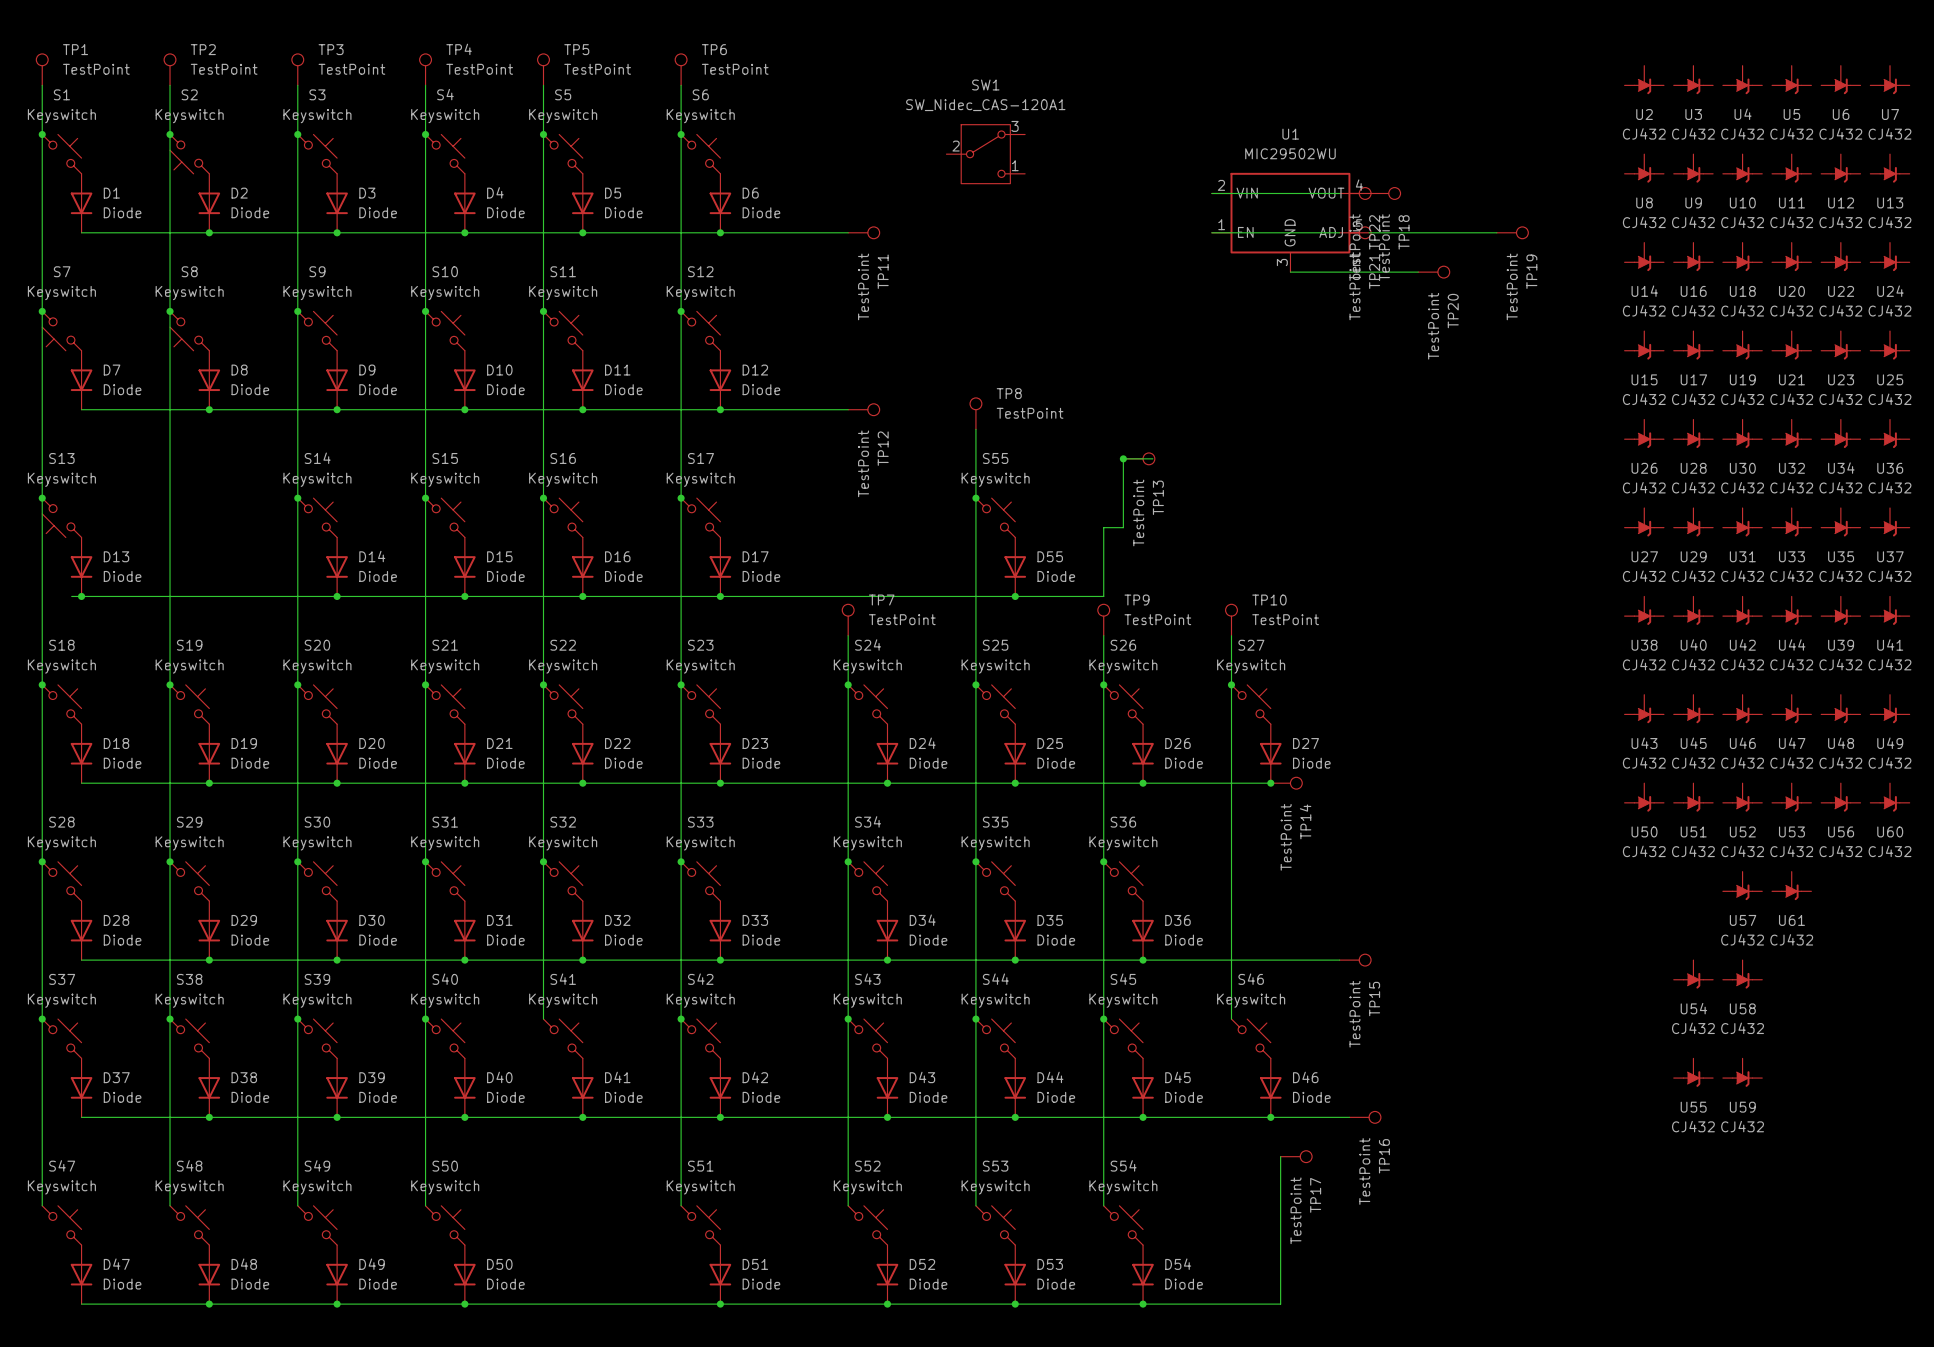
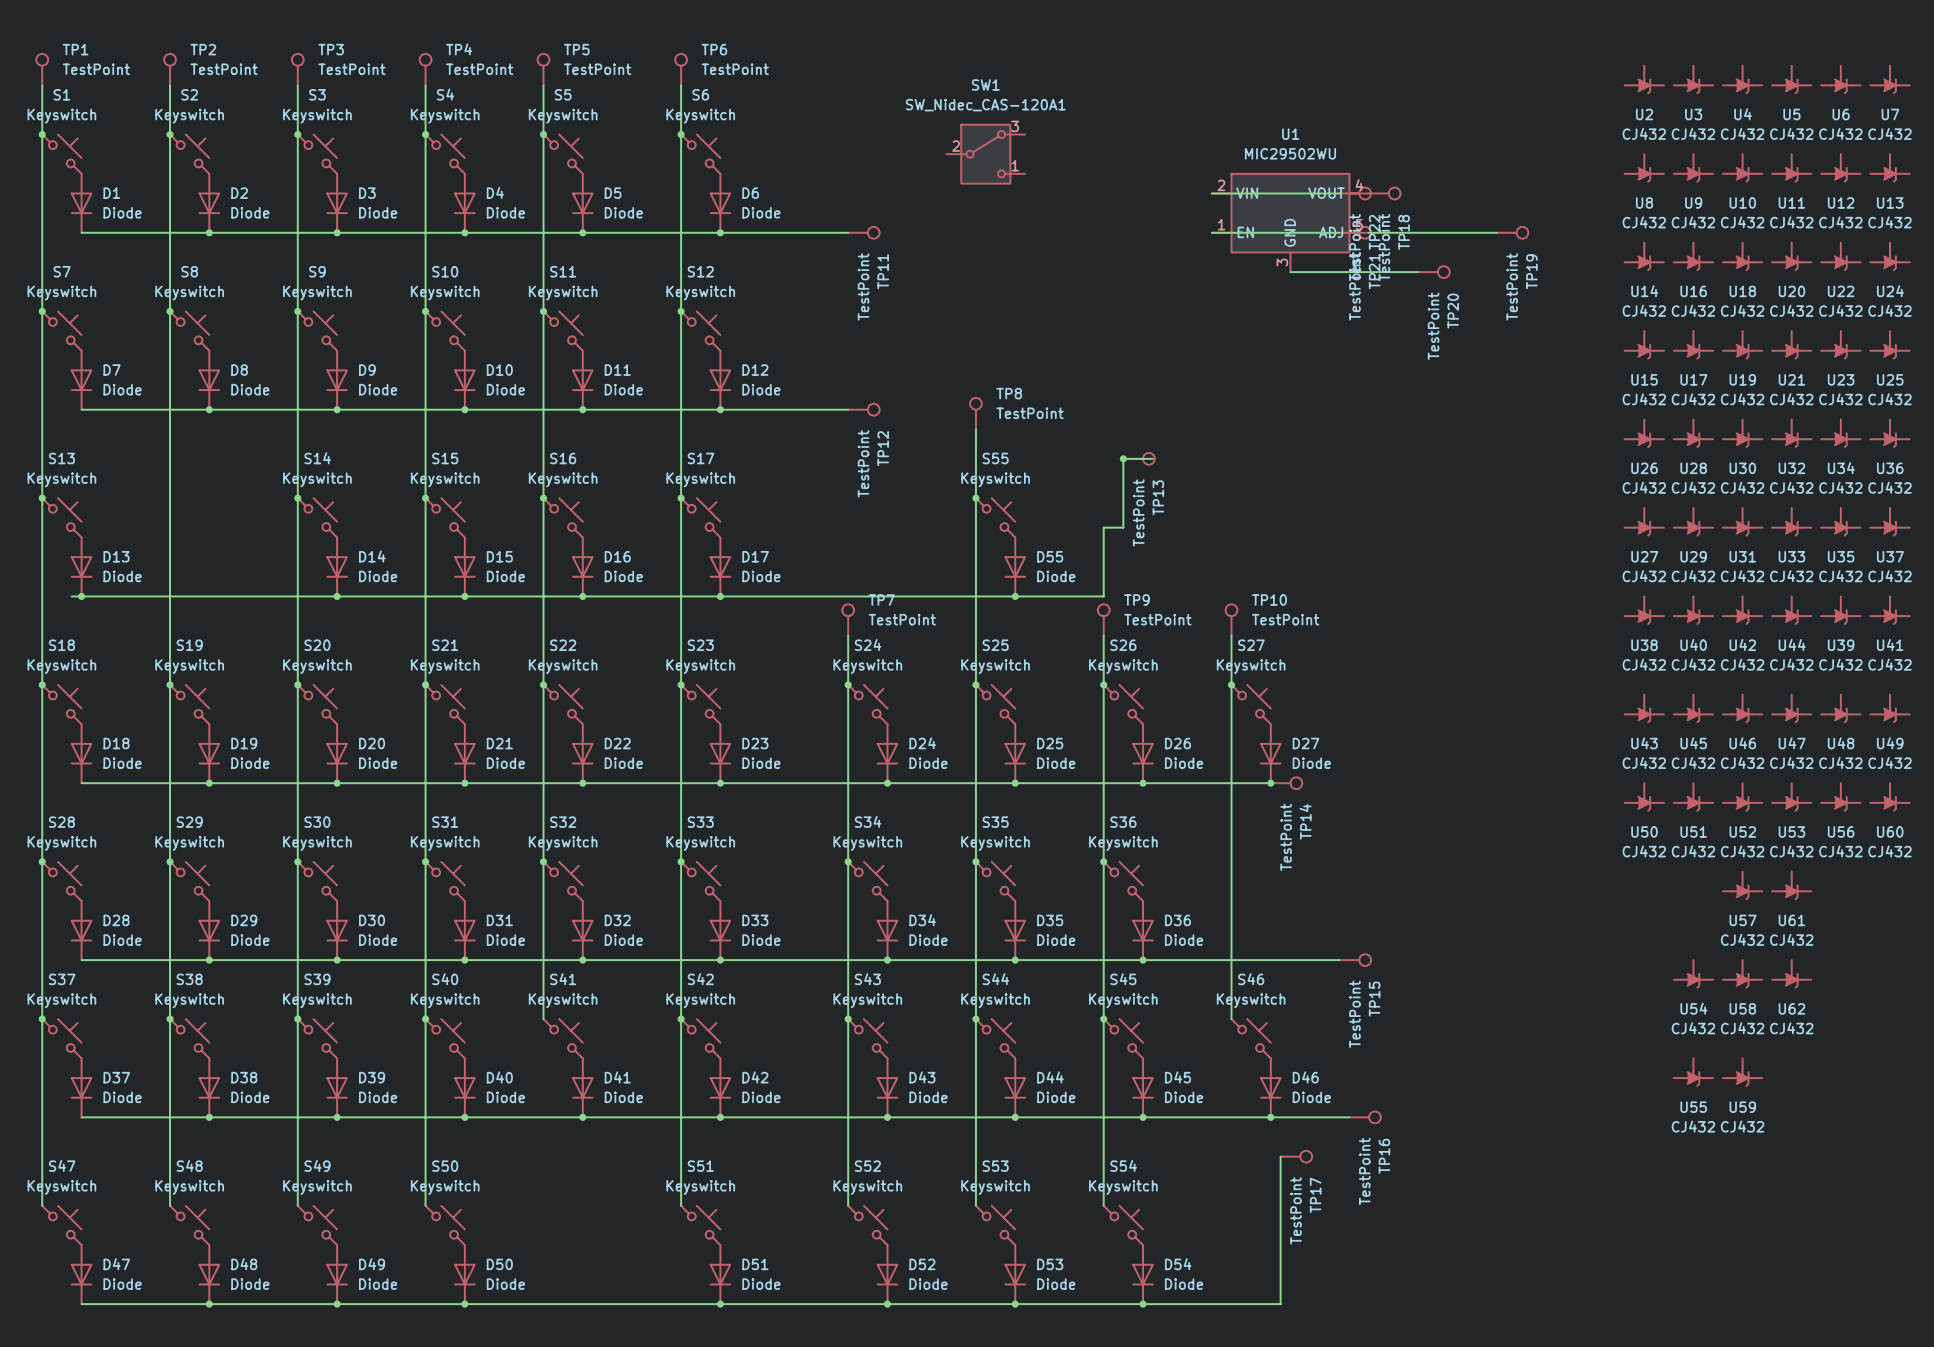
S2 rotation: 0° (189, 154) -> 180° (189, 154)
S7 rotation: 0° (61, 331) -> 180° (61, 331)
S8 rotation: 0° (189, 331) -> 180° (189, 331)
S13 rotation: 0° (61, 517) -> 180° (61, 517)
U62: none -> CJ432 (1791, 974)

